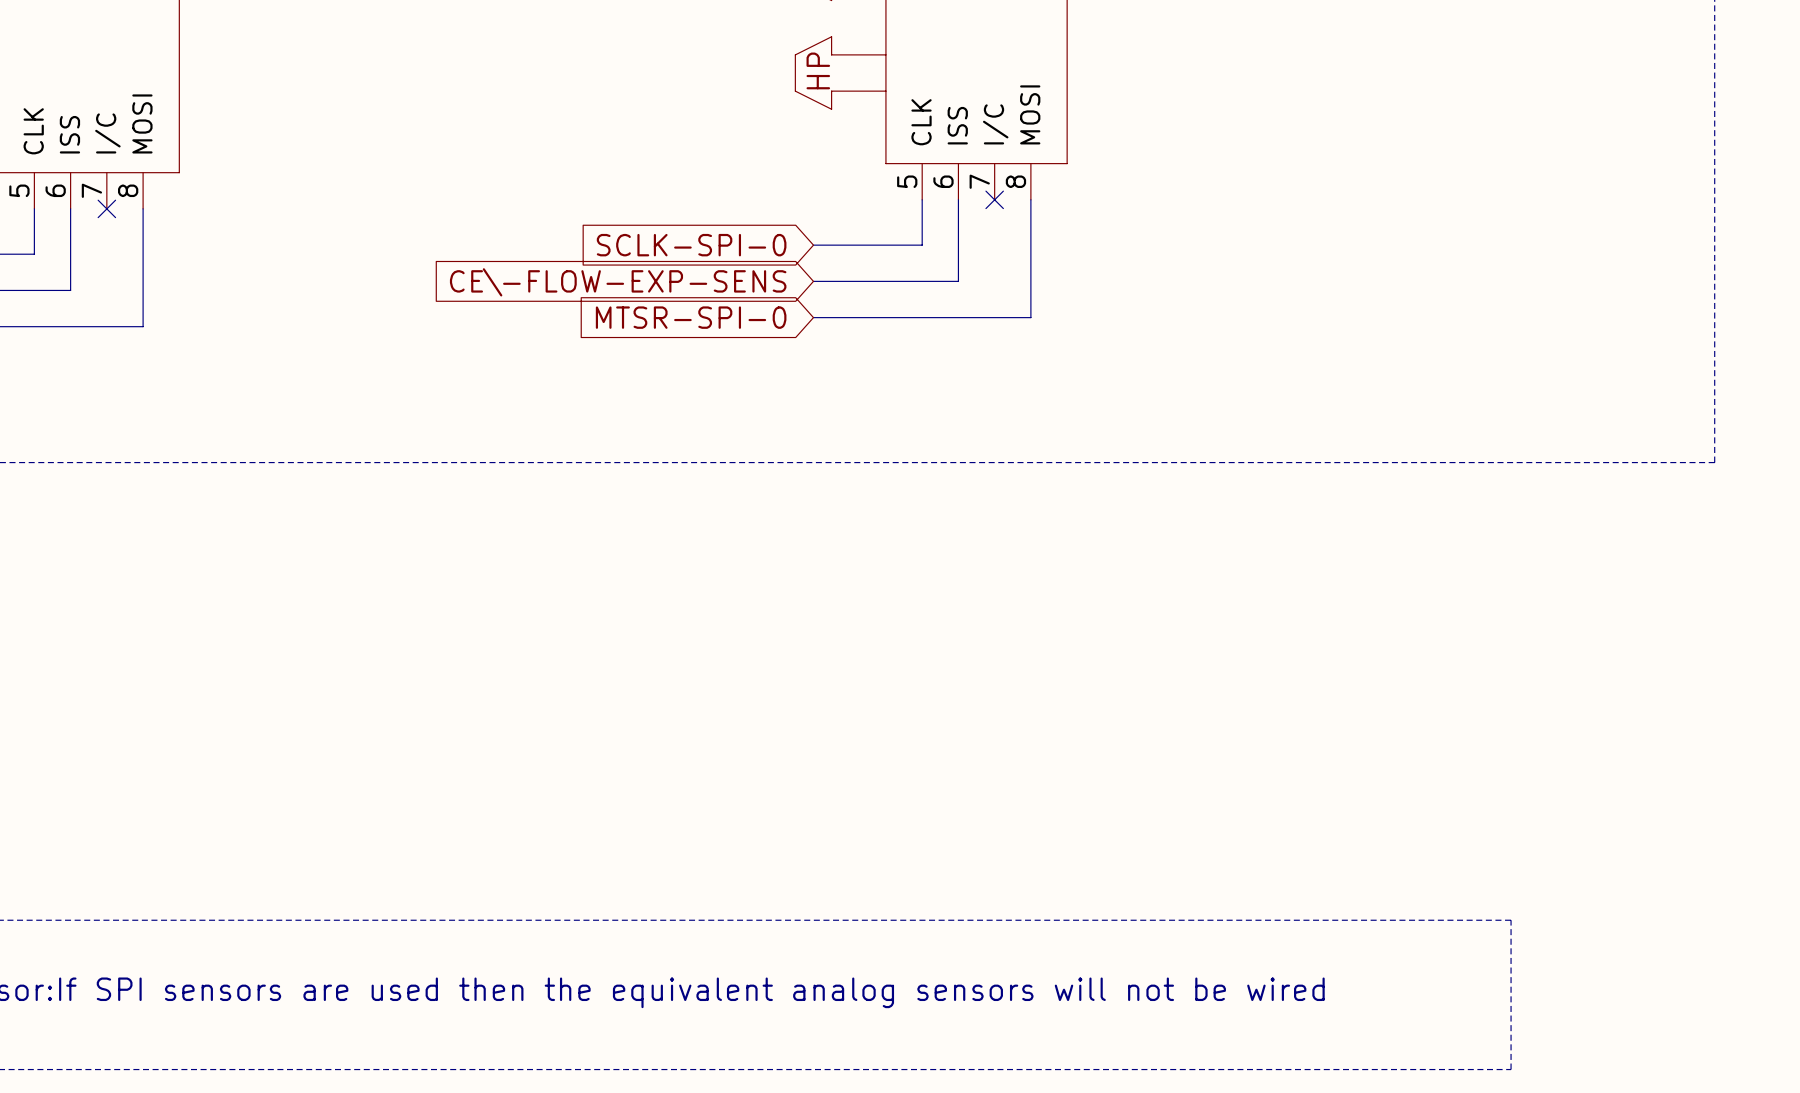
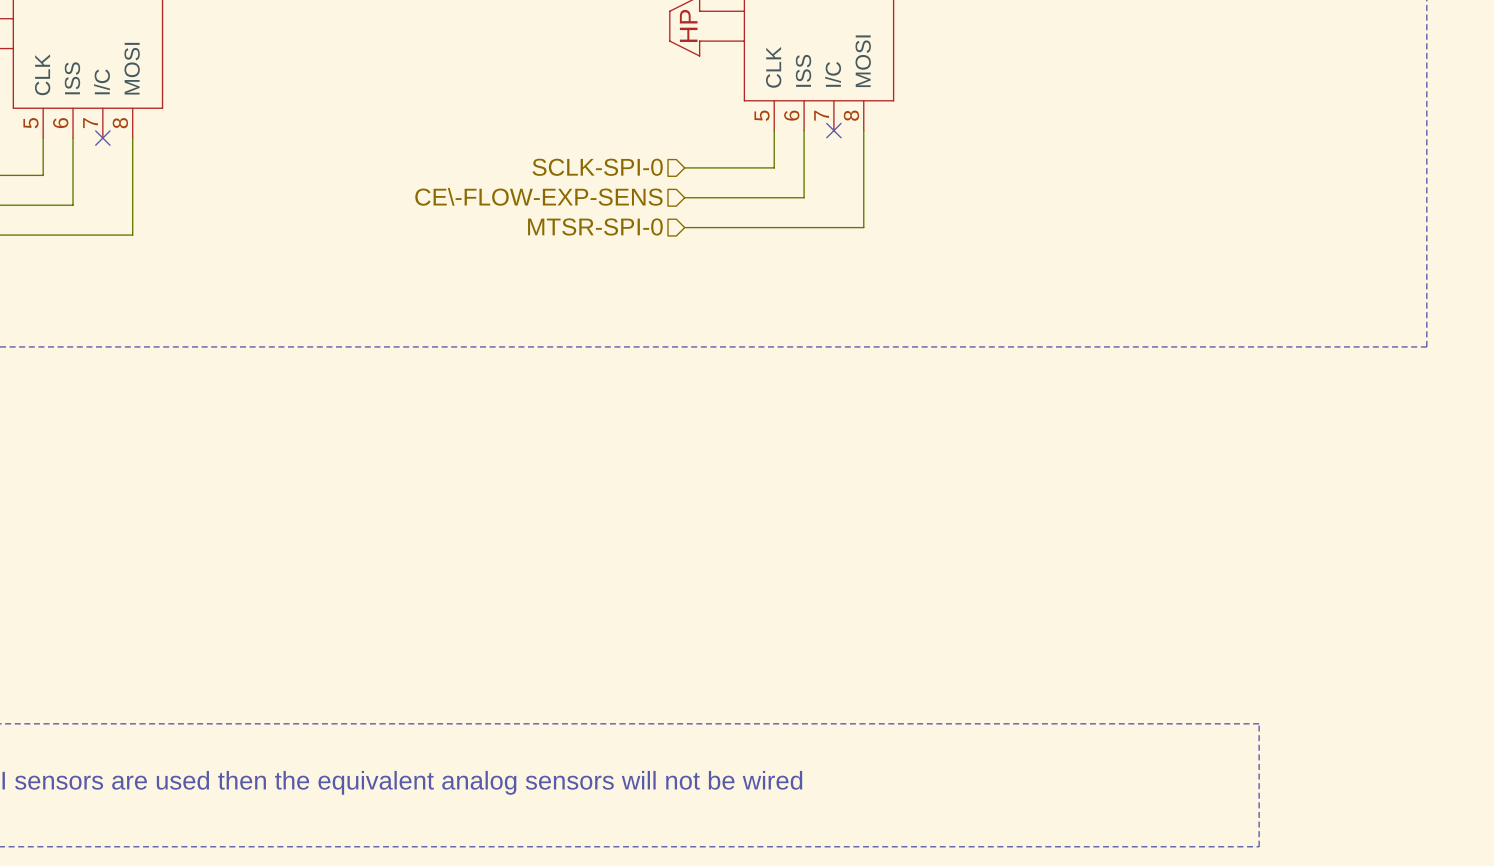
hierarchical label: none -> SCLK-SPI-0 (597, 167)
global label: SCLK-SPI-0 (691, 245) -> none
hierarchical label: none -> CE\-FLOW-EXP-SENS (538, 196)
global label: CE\-FLOW-EXP-SENS (618, 282) -> none
hierarchical label: none -> MTSR-SPI-0 (595, 226)
global label: MTSR-SPI-0 (691, 317) -> none

